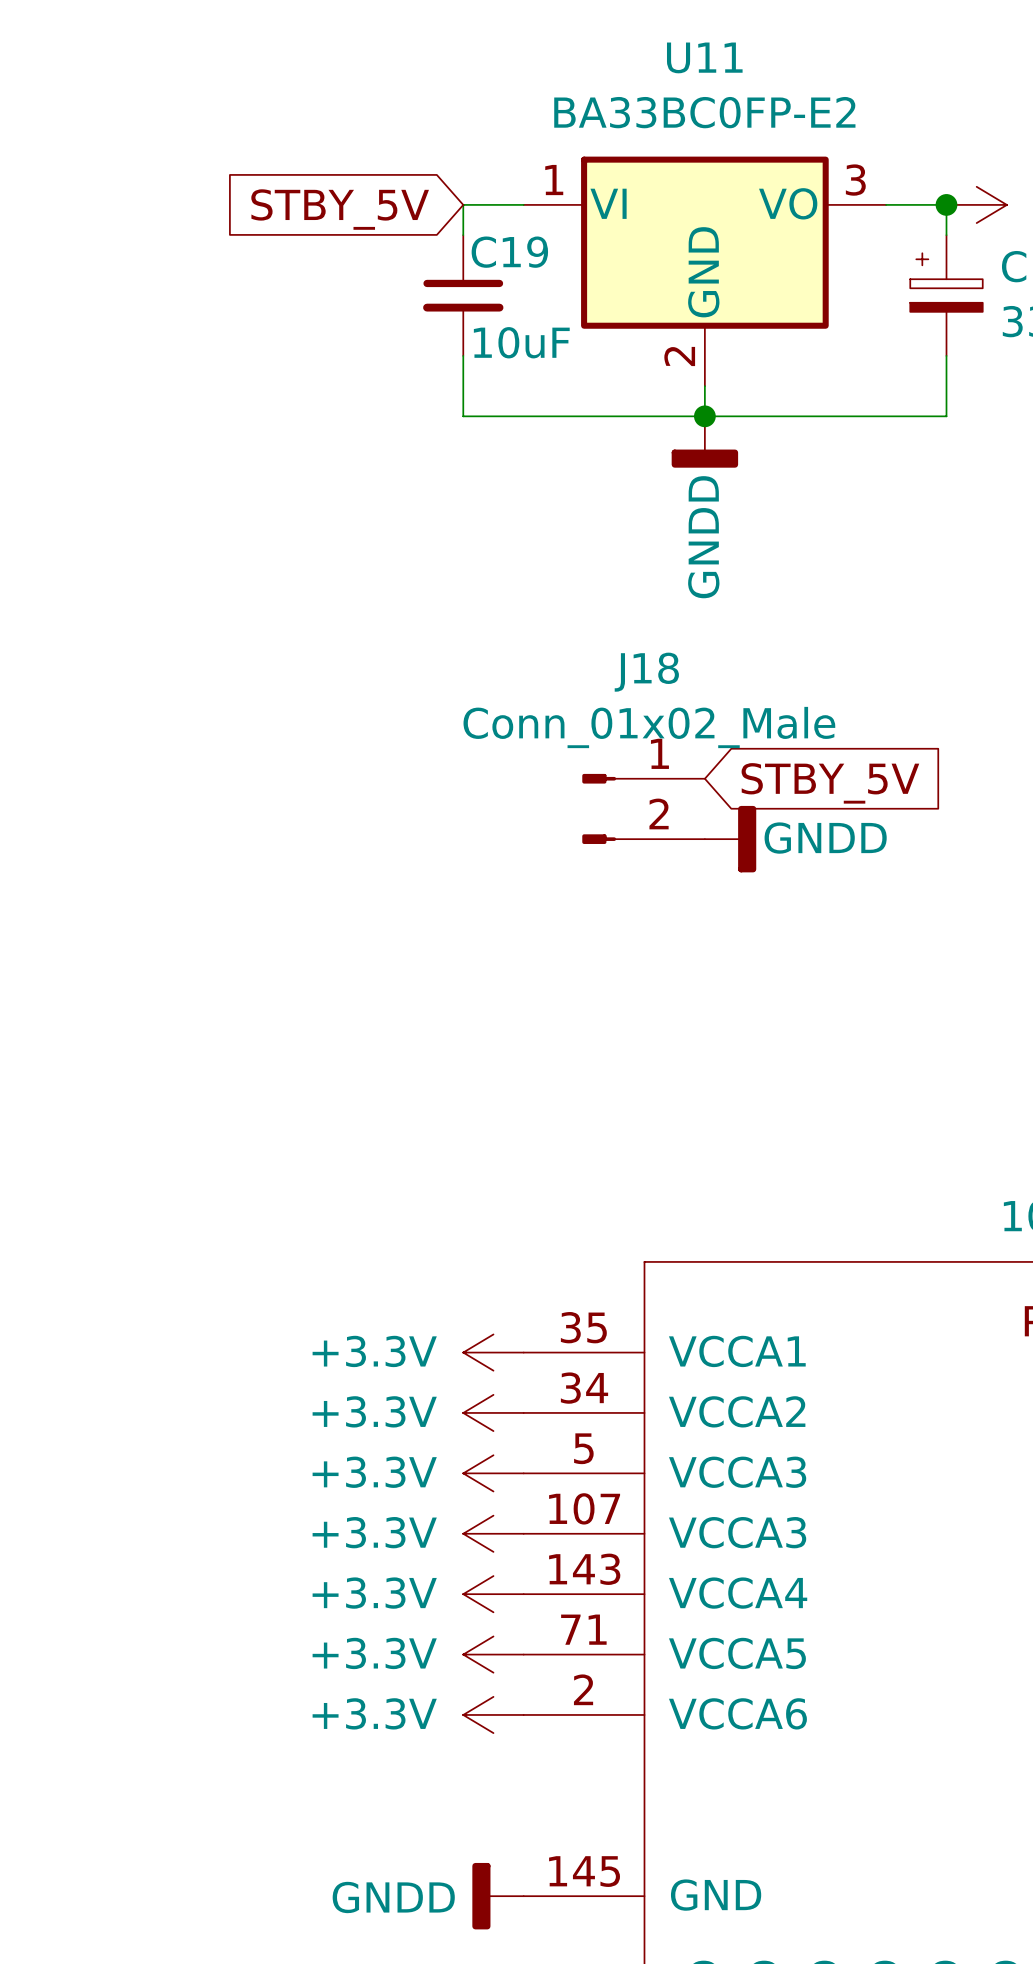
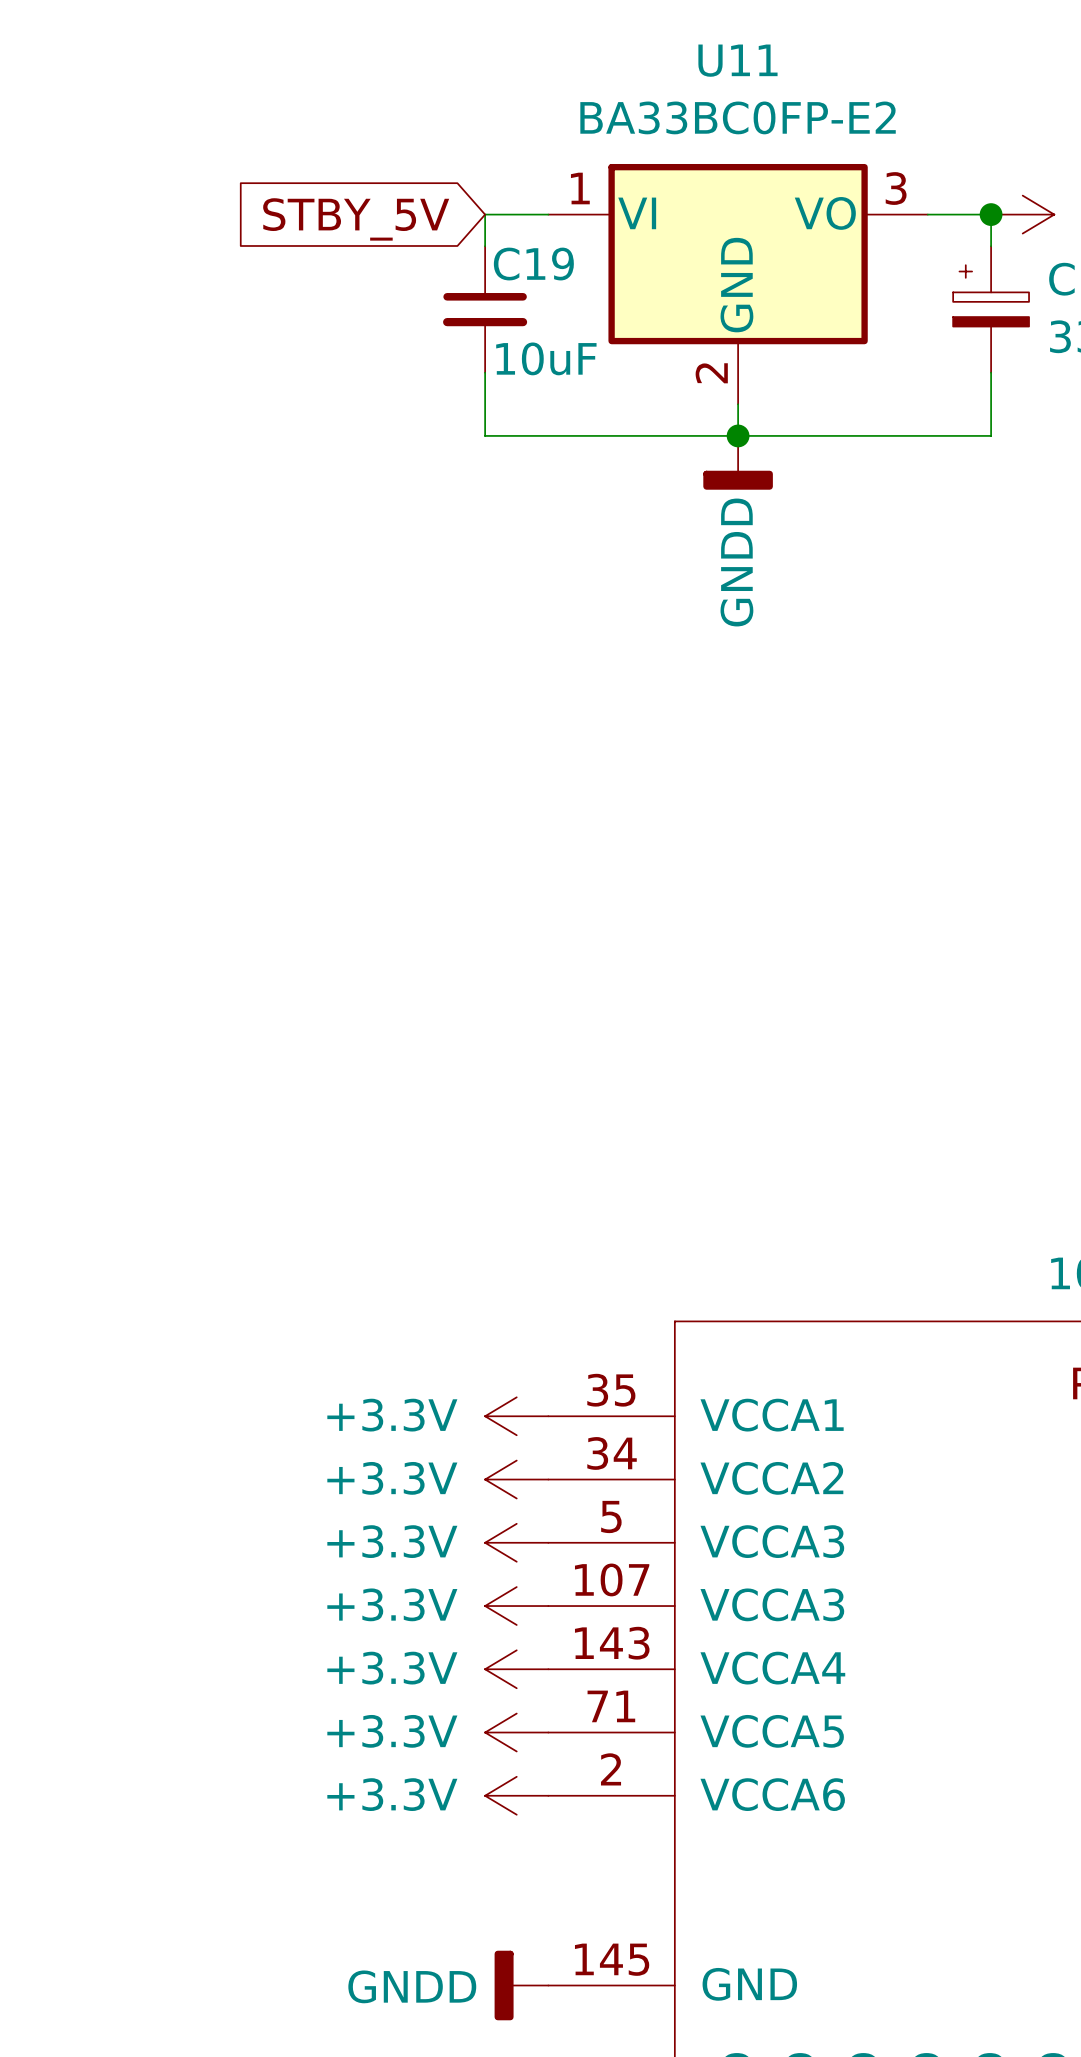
global label: STBY_5V (830, 783) -> none
J18: Conn_01x02_Male (643, 808) -> none
power symbol: GNDD (730, 839) -> none

